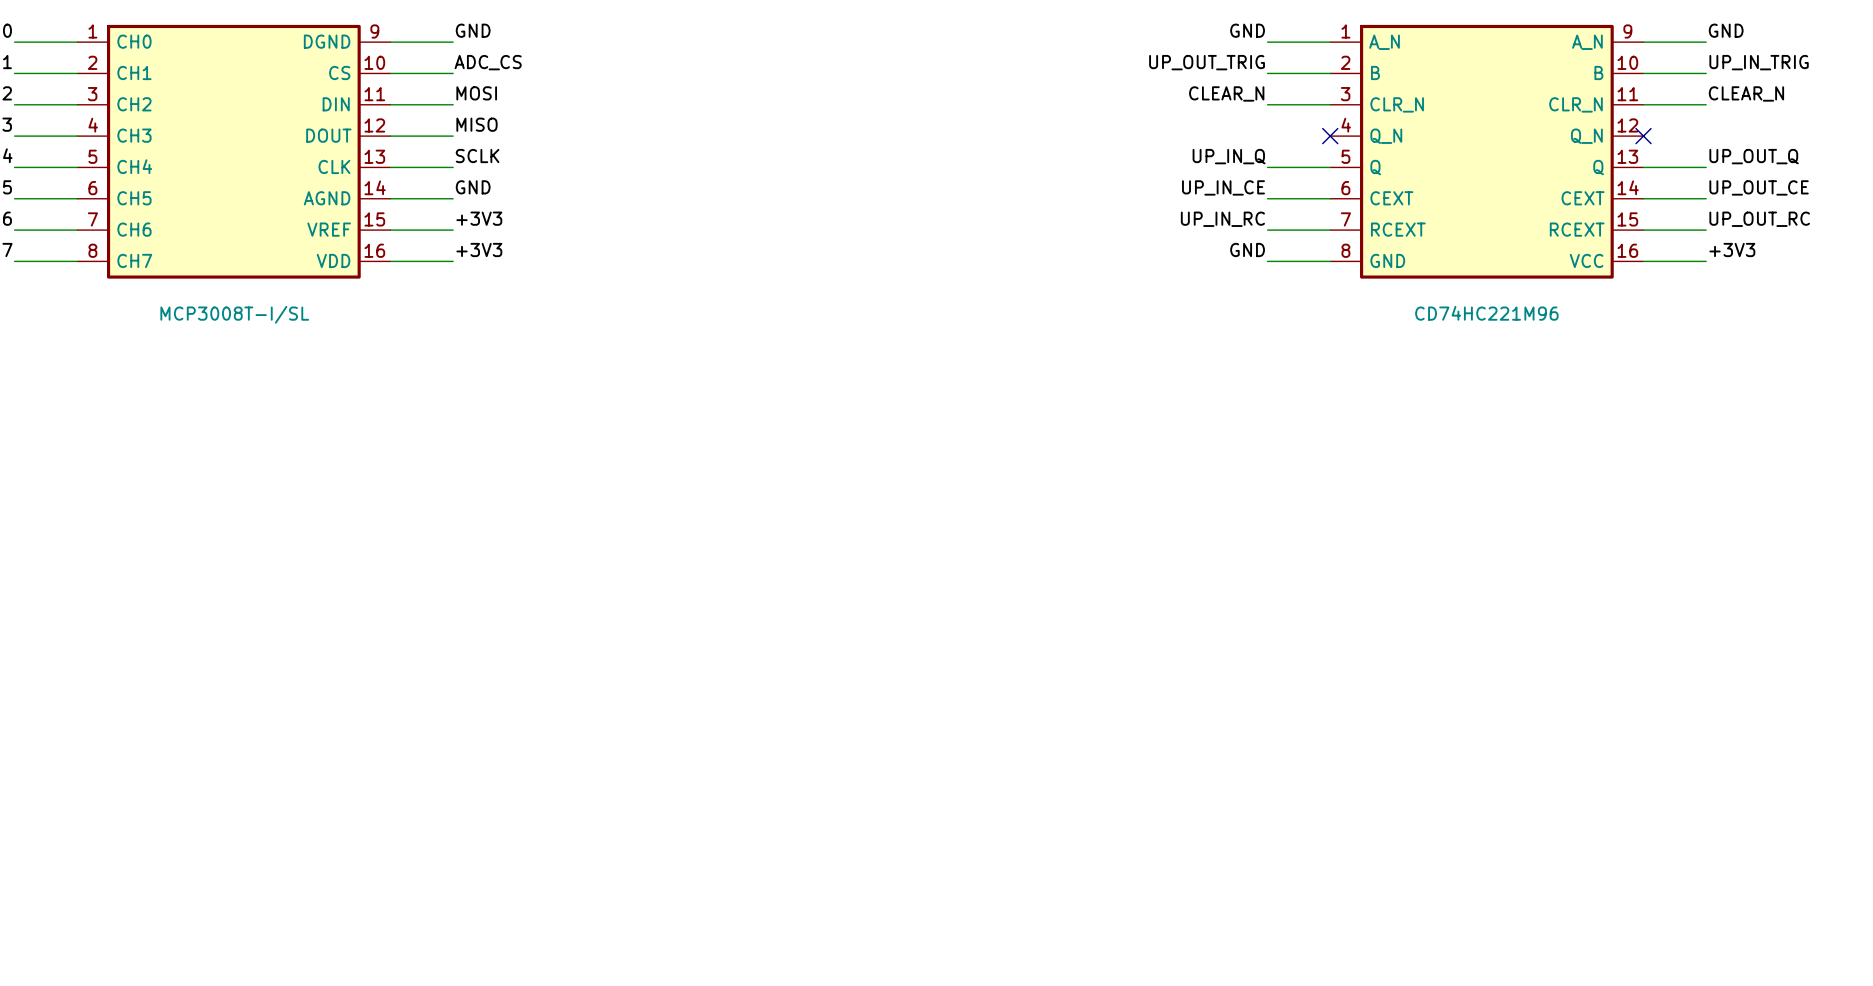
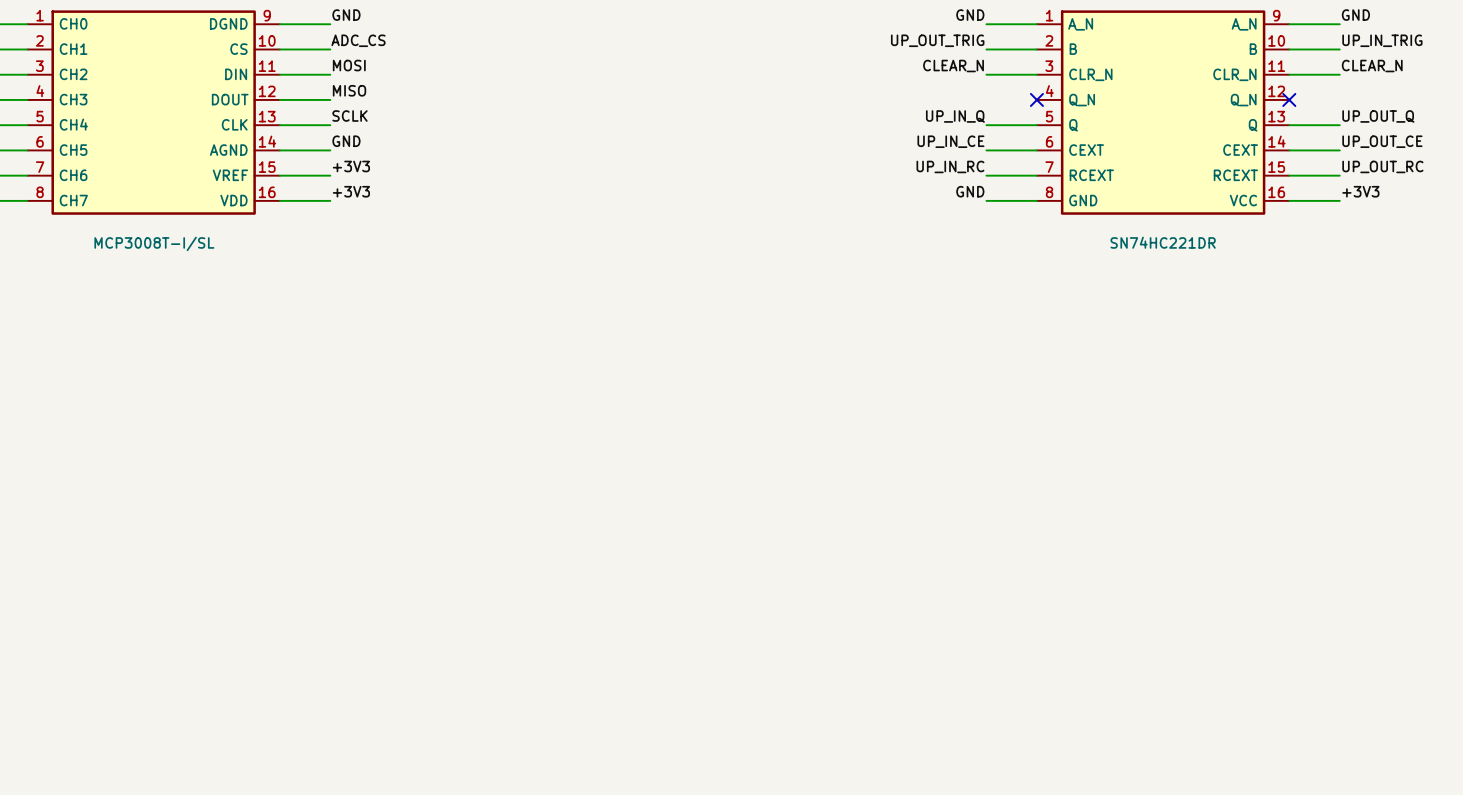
part value: CD74HC221M96 (1486, 313) -> SN74HC221DR (1163, 242)

